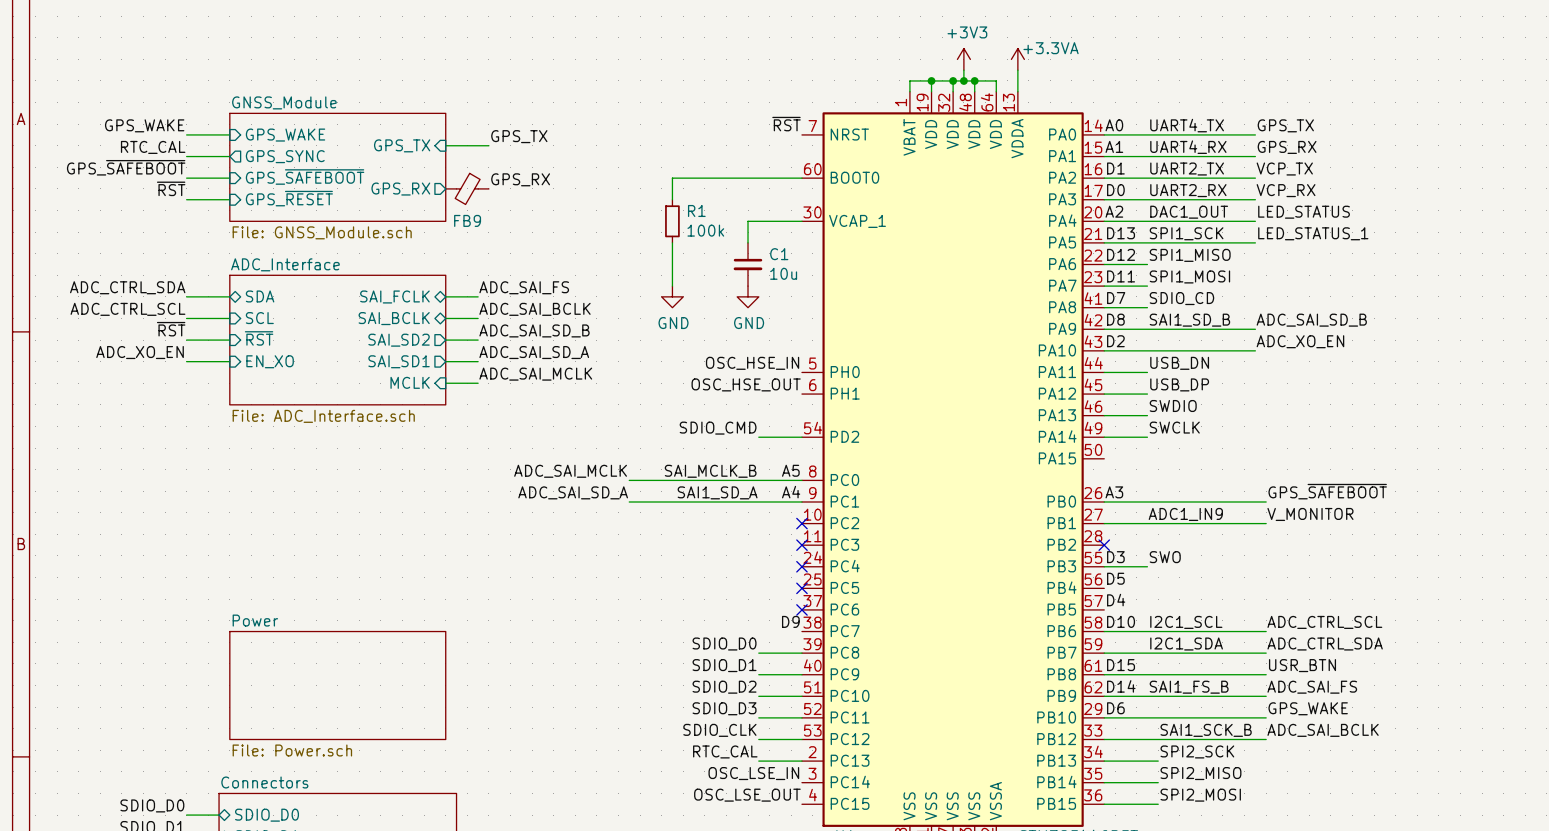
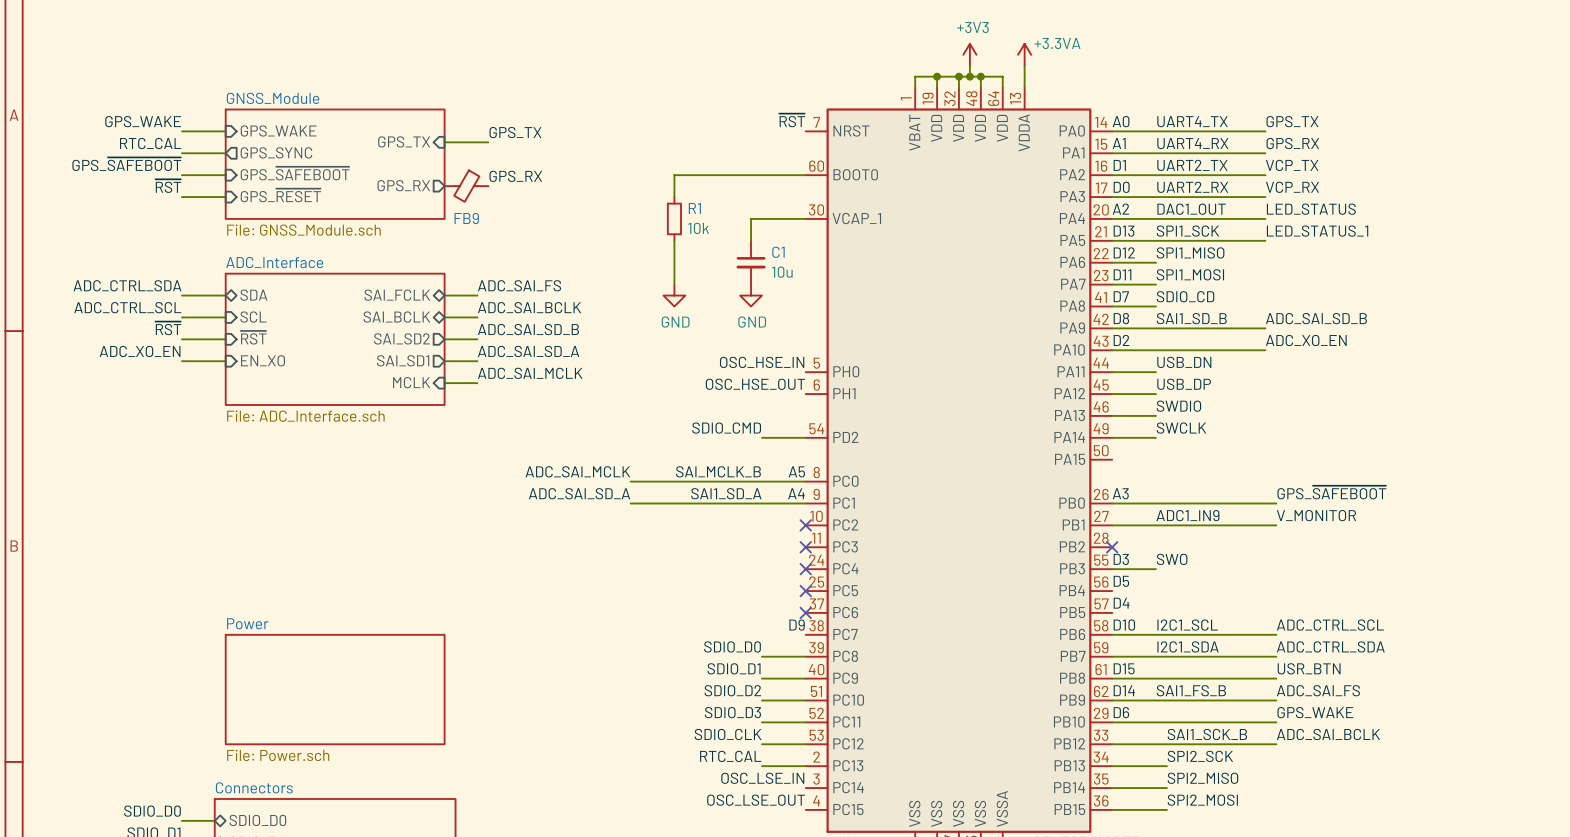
R1 value: 100k (705, 230) -> 10k (698, 228)

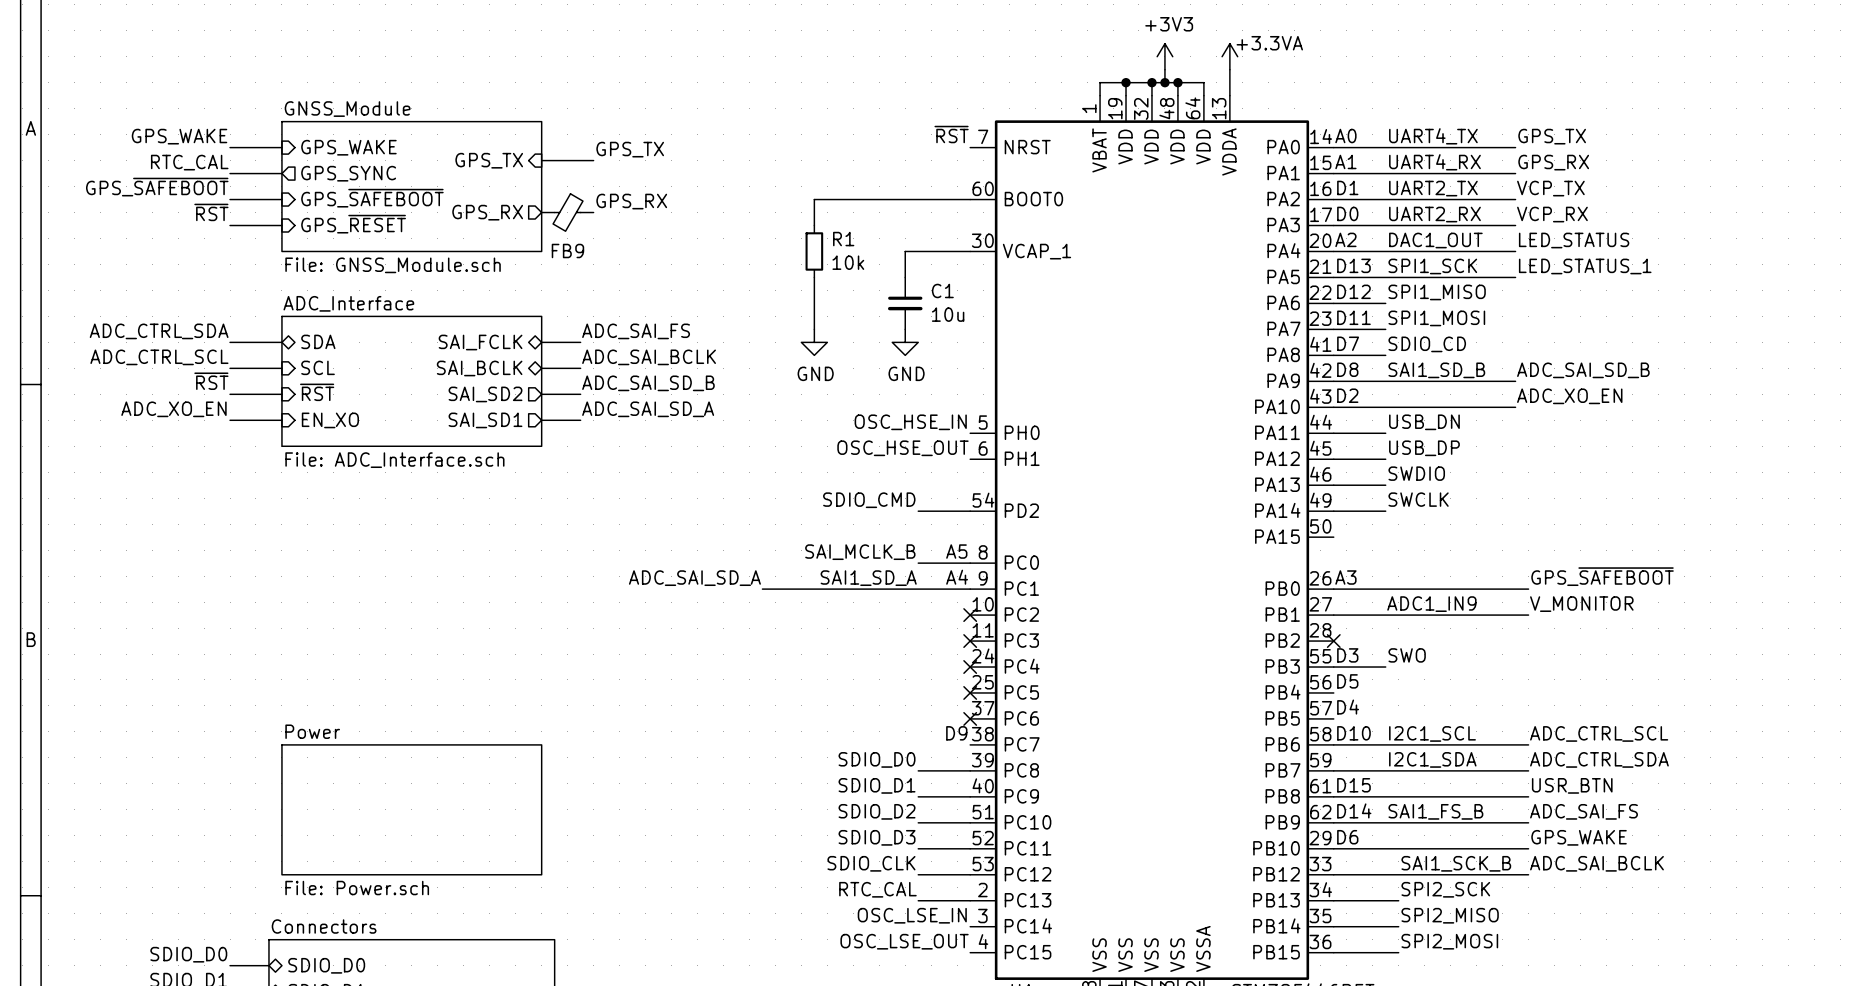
sheet ADC_Interface: none -> File: ADC_Interface.sch (411, 381)
sheet ADC_Interface: File: ADC_Interface.sch (335, 339) -> none
label: ADC_SAI_MCLK (530, 373) -> none
sheet pin: MCLK (411, 382) -> none
wire: (444, 383) (477, 383) -> none
label: ADC_SAI_MCLK (577, 471) -> none
wire: (630, 481) (761, 481) -> none

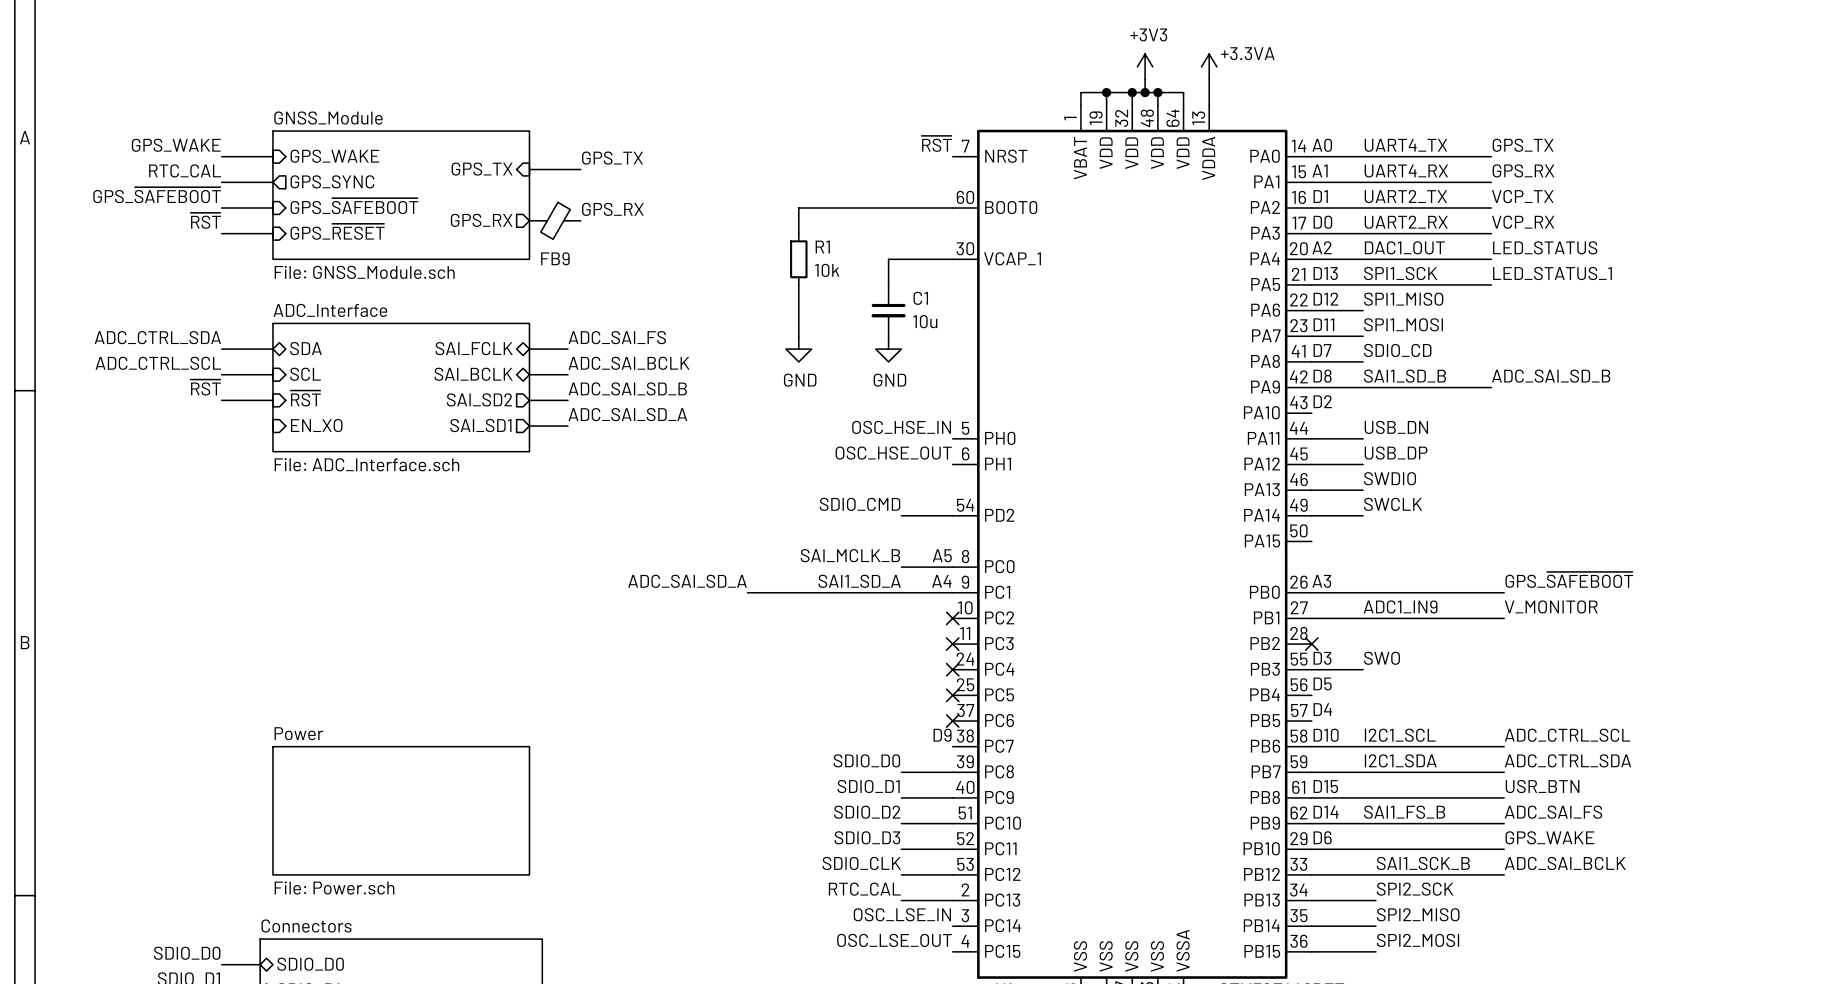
label: ADC_XO_EN (1569, 396) -> none
wire: (1333, 407) (1515, 407) -> none
label: ADC_XO_EN (173, 409) -> none
wire: (230, 420) (281, 420) -> none

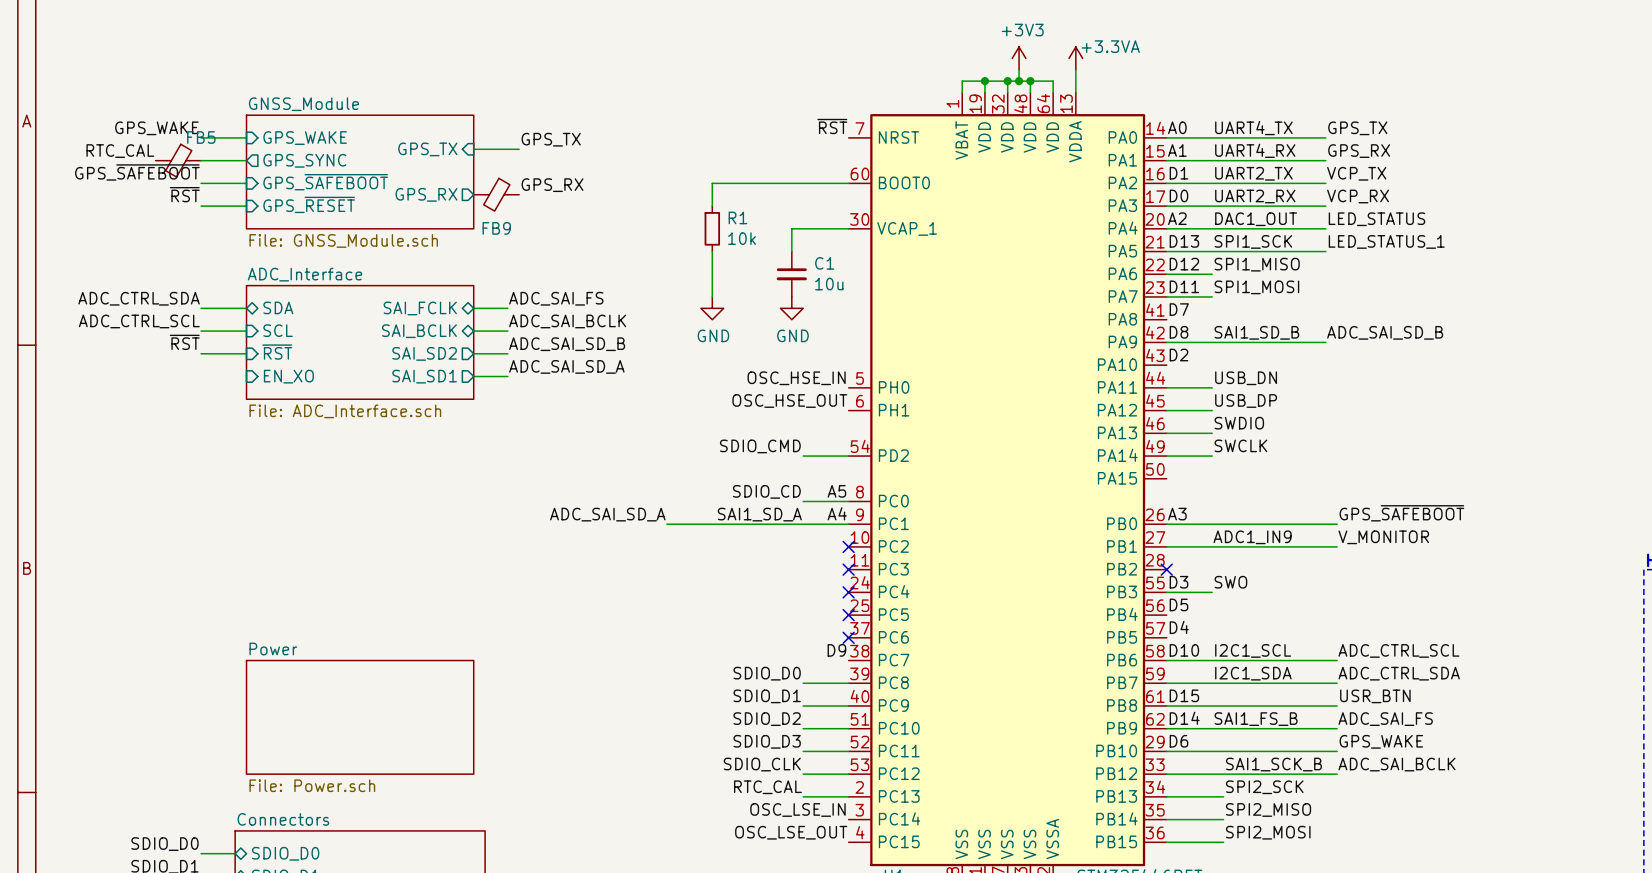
label position: RTC_CAL (185, 170) -> RTC_CAL (120, 151)
FB5: none -> (178, 160)
label: SDIO_CD (1397, 350) -> none
wire: (1311, 361) (1363, 361) -> none
label: SAI_MCLK_B (850, 555) -> SDIO_CD (766, 491)

